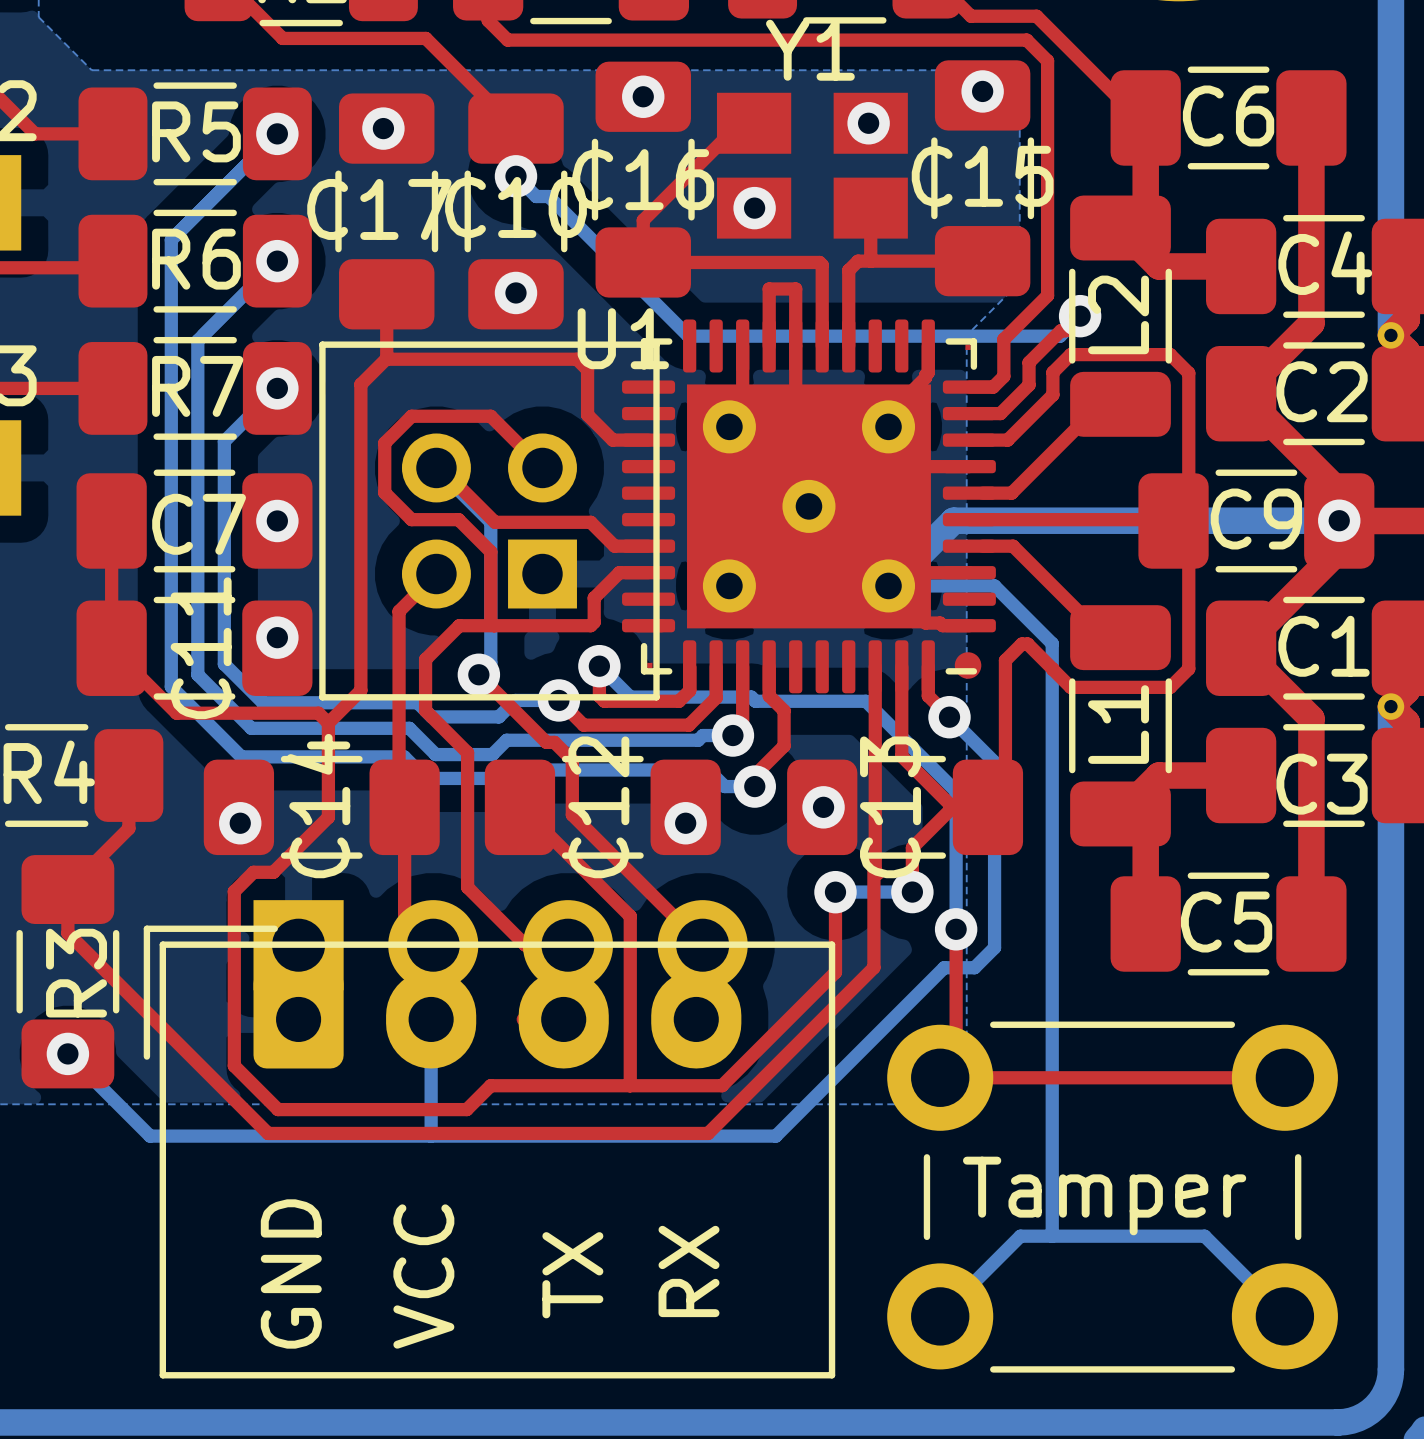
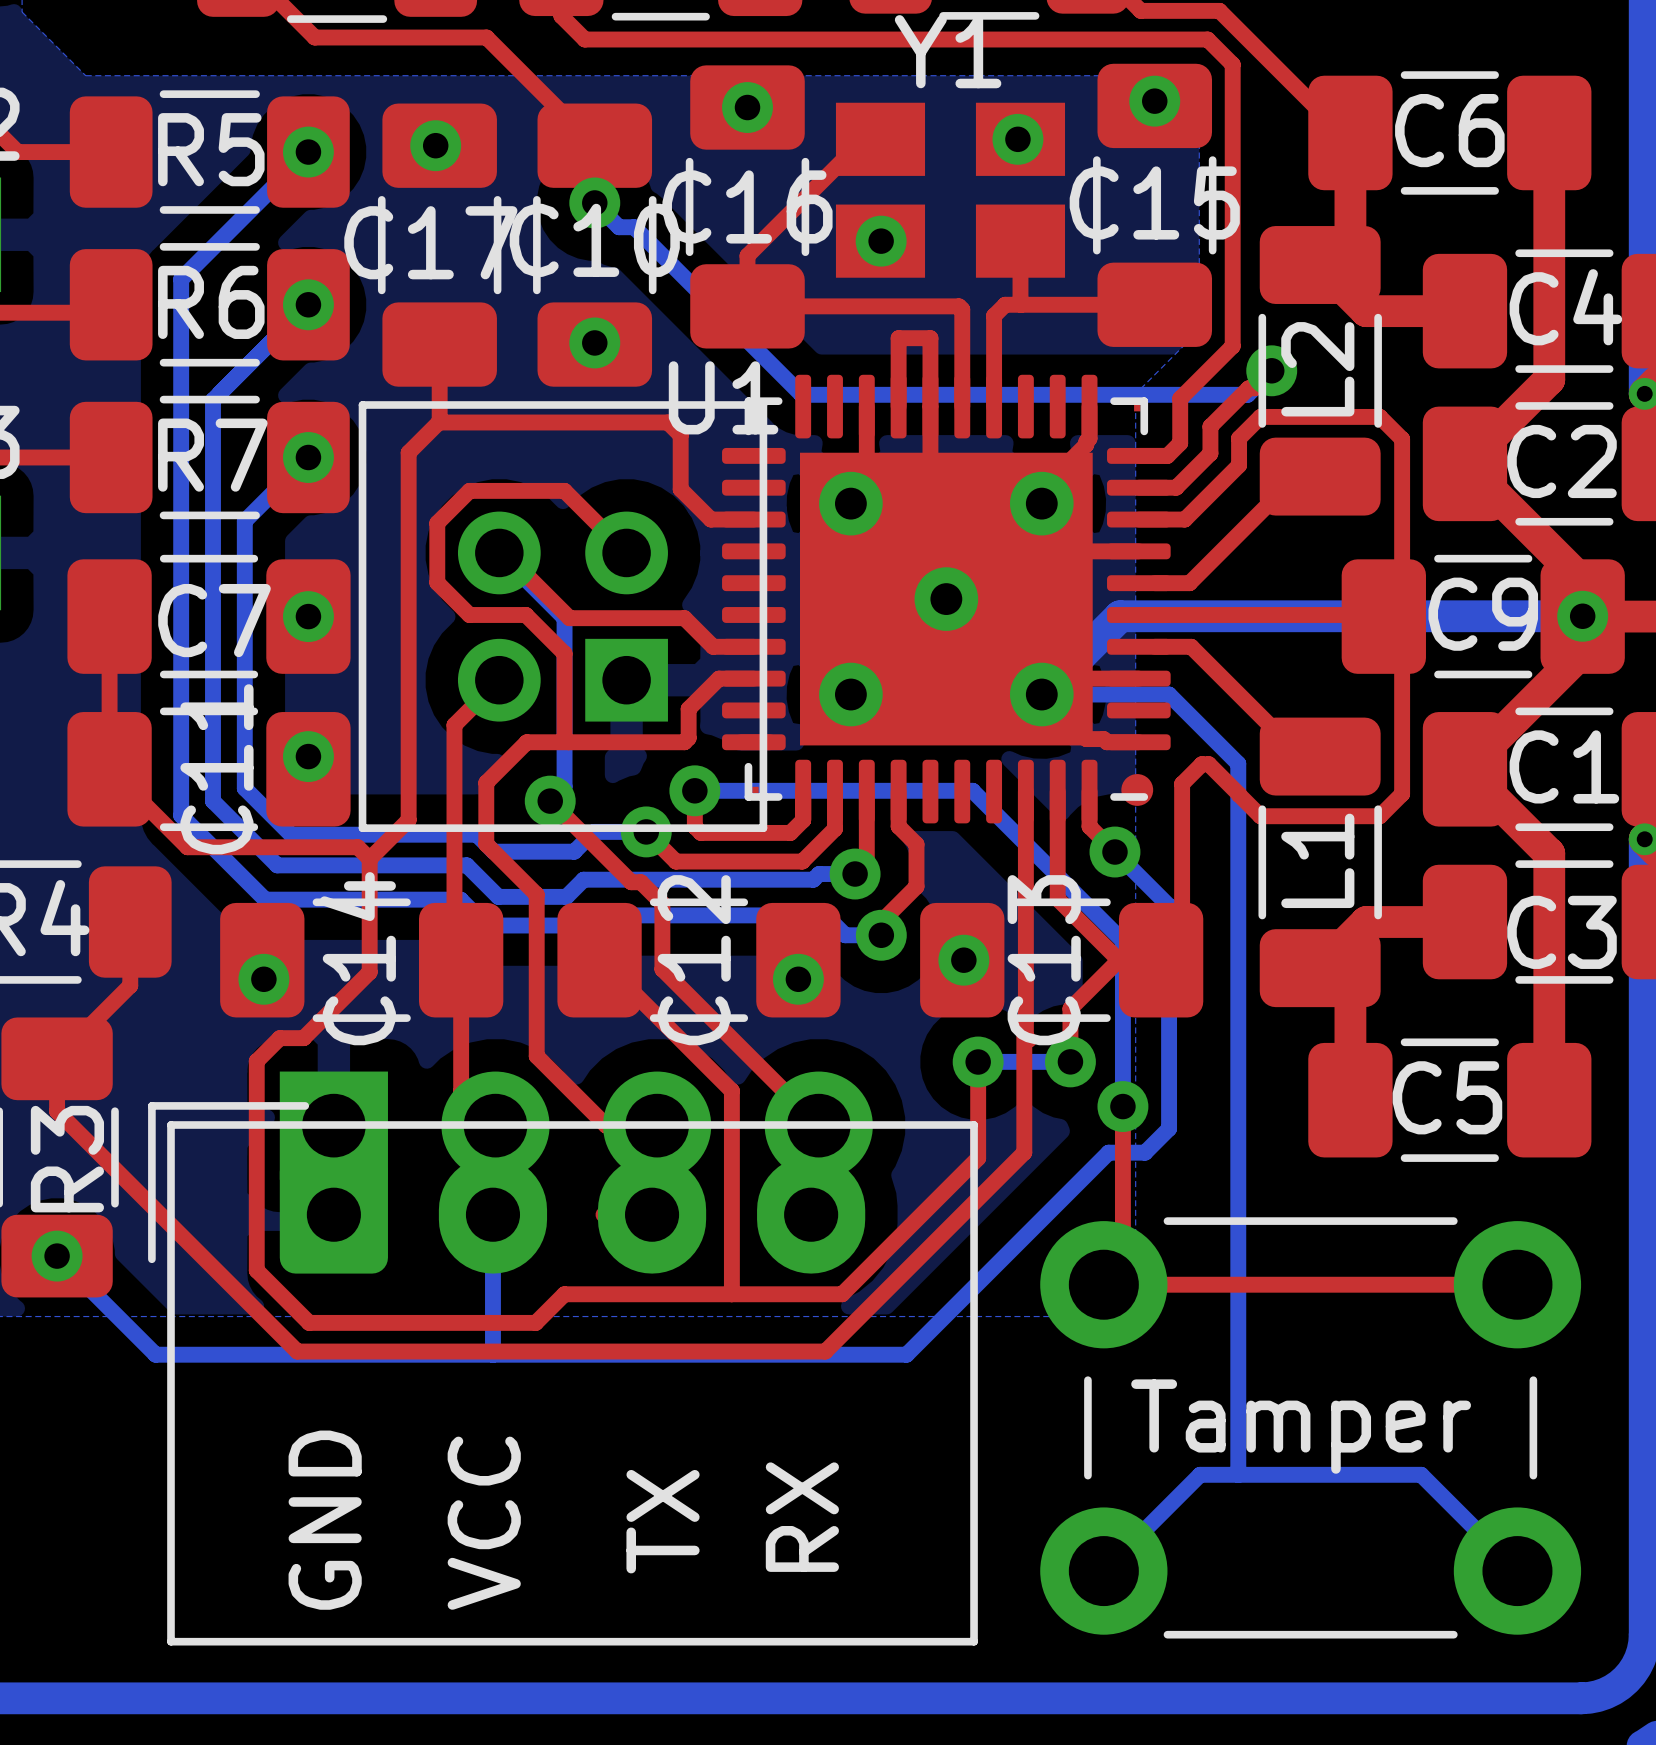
bottom track: (599, 666) (630, 697) (751, 697) (755, 701) (865, 701) -> (694, 790) (972, 790) (1014, 832)

